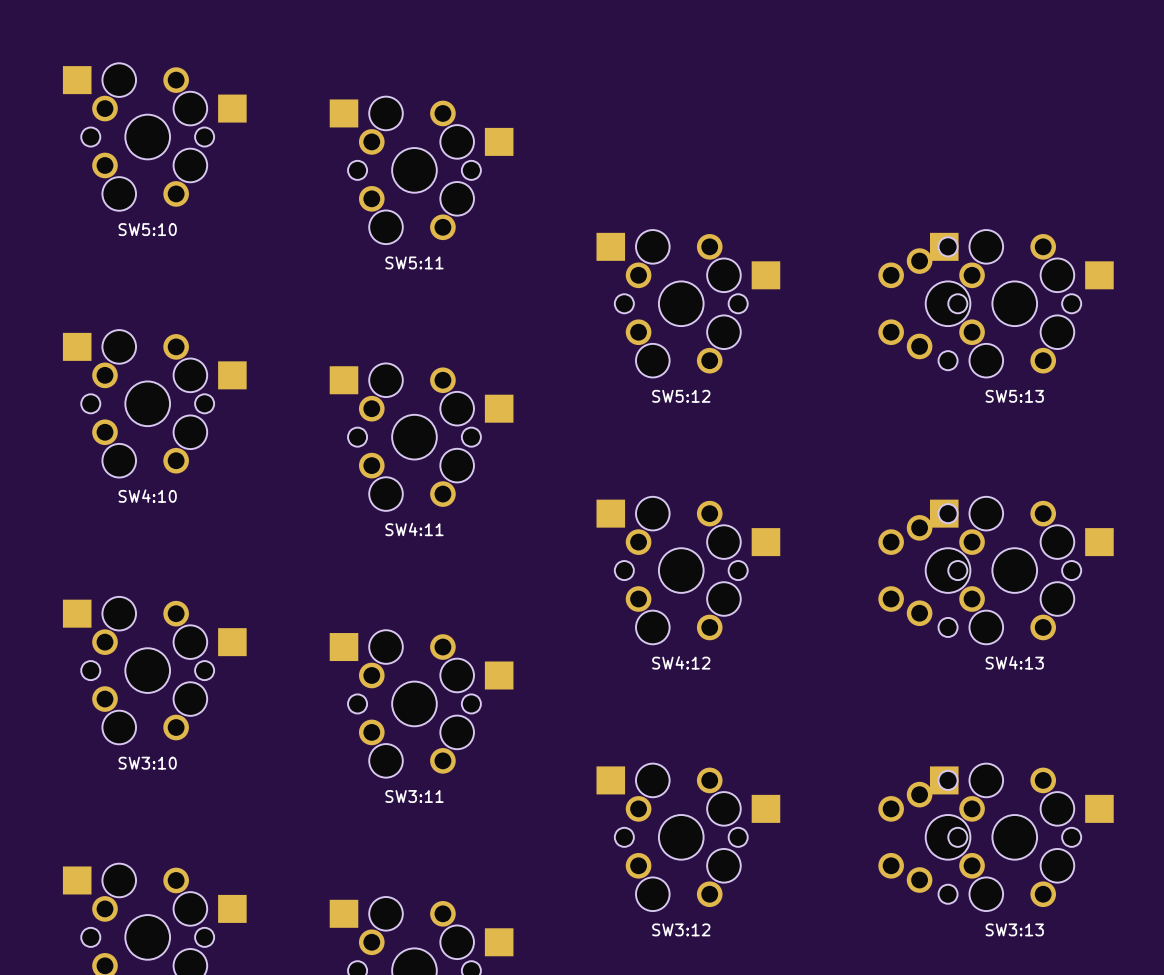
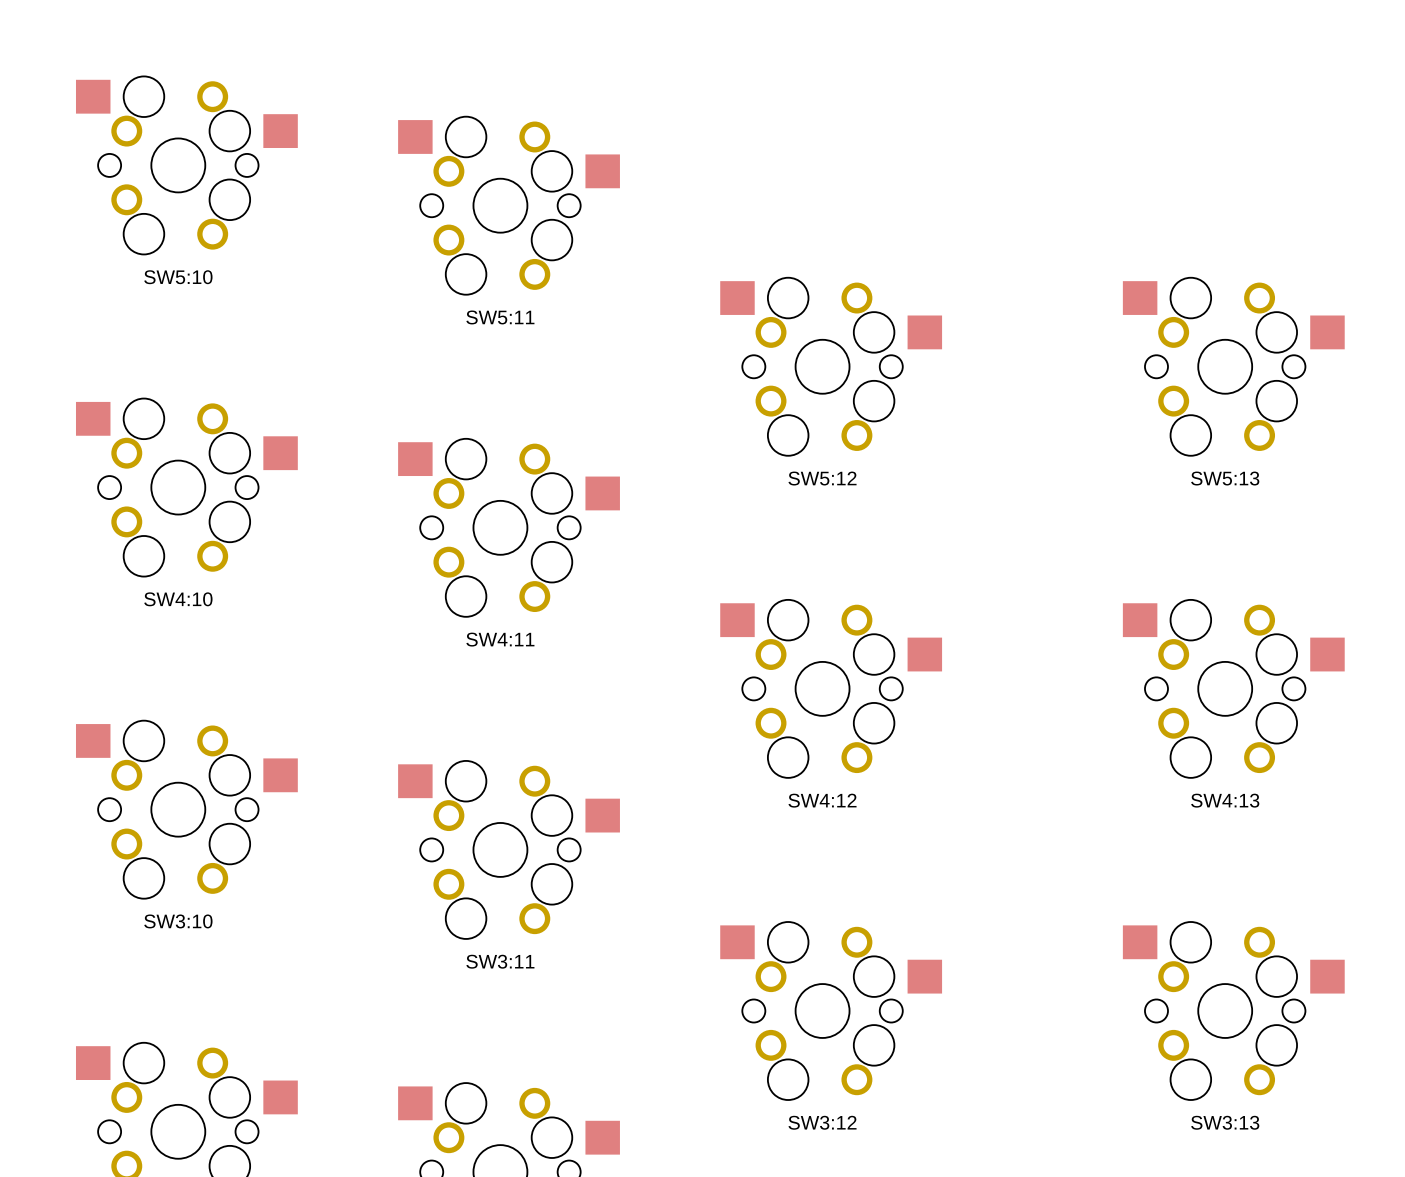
part: (924, 303) -> none
part: (924, 570) -> none
part: (924, 837) -> none

